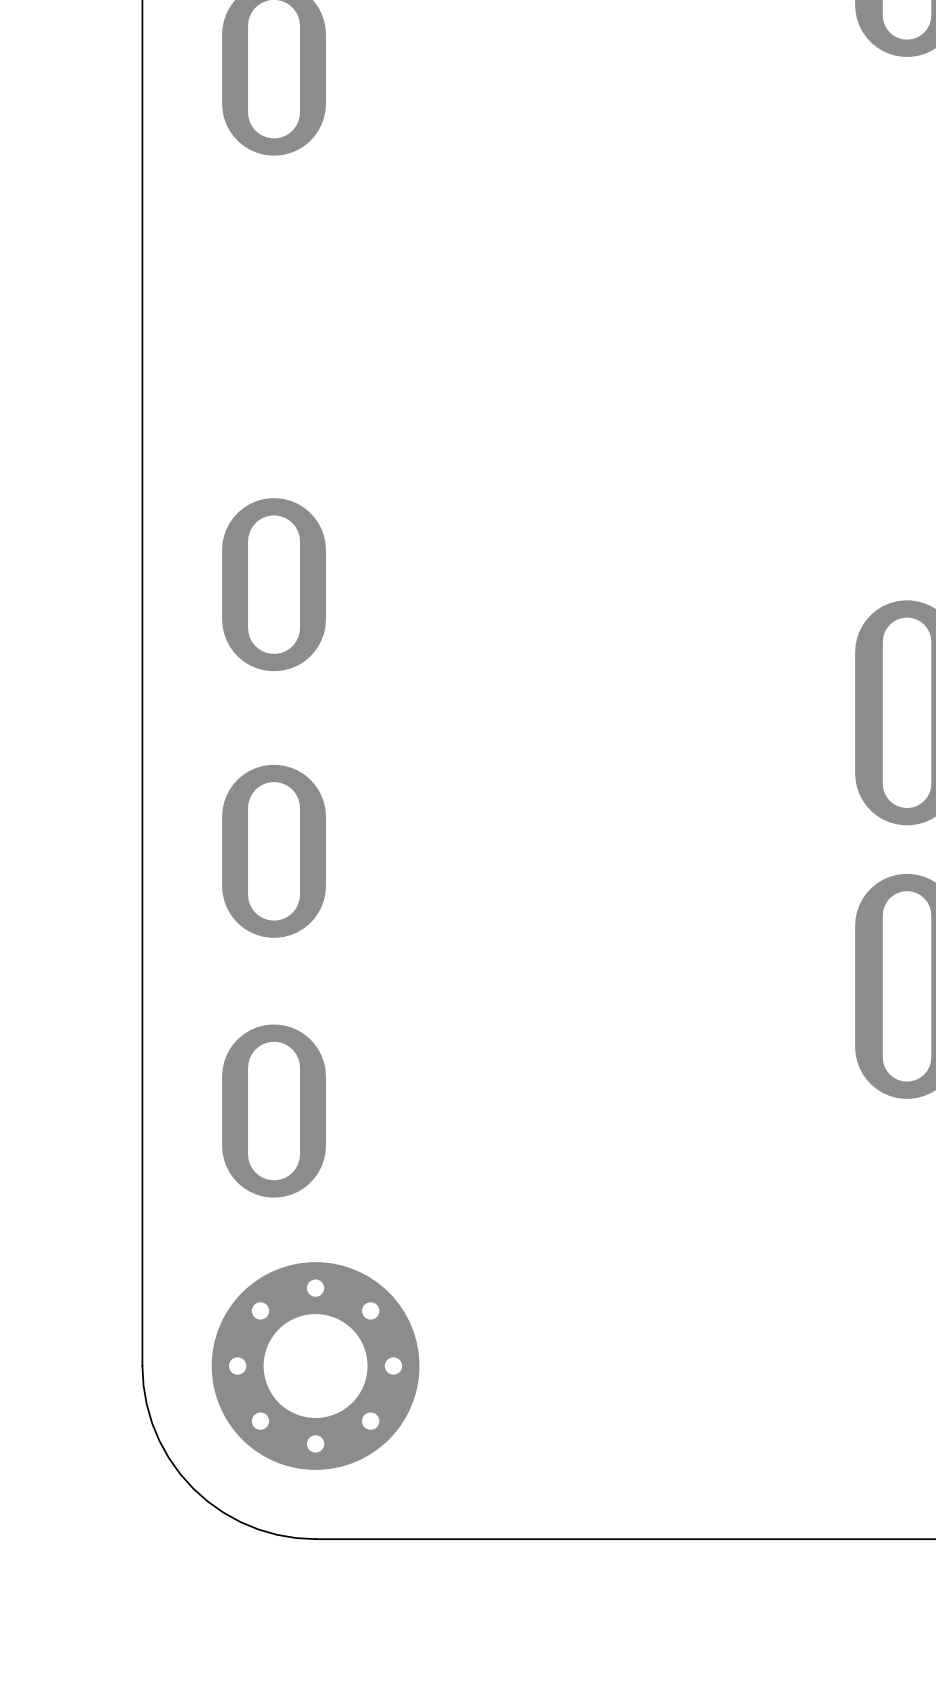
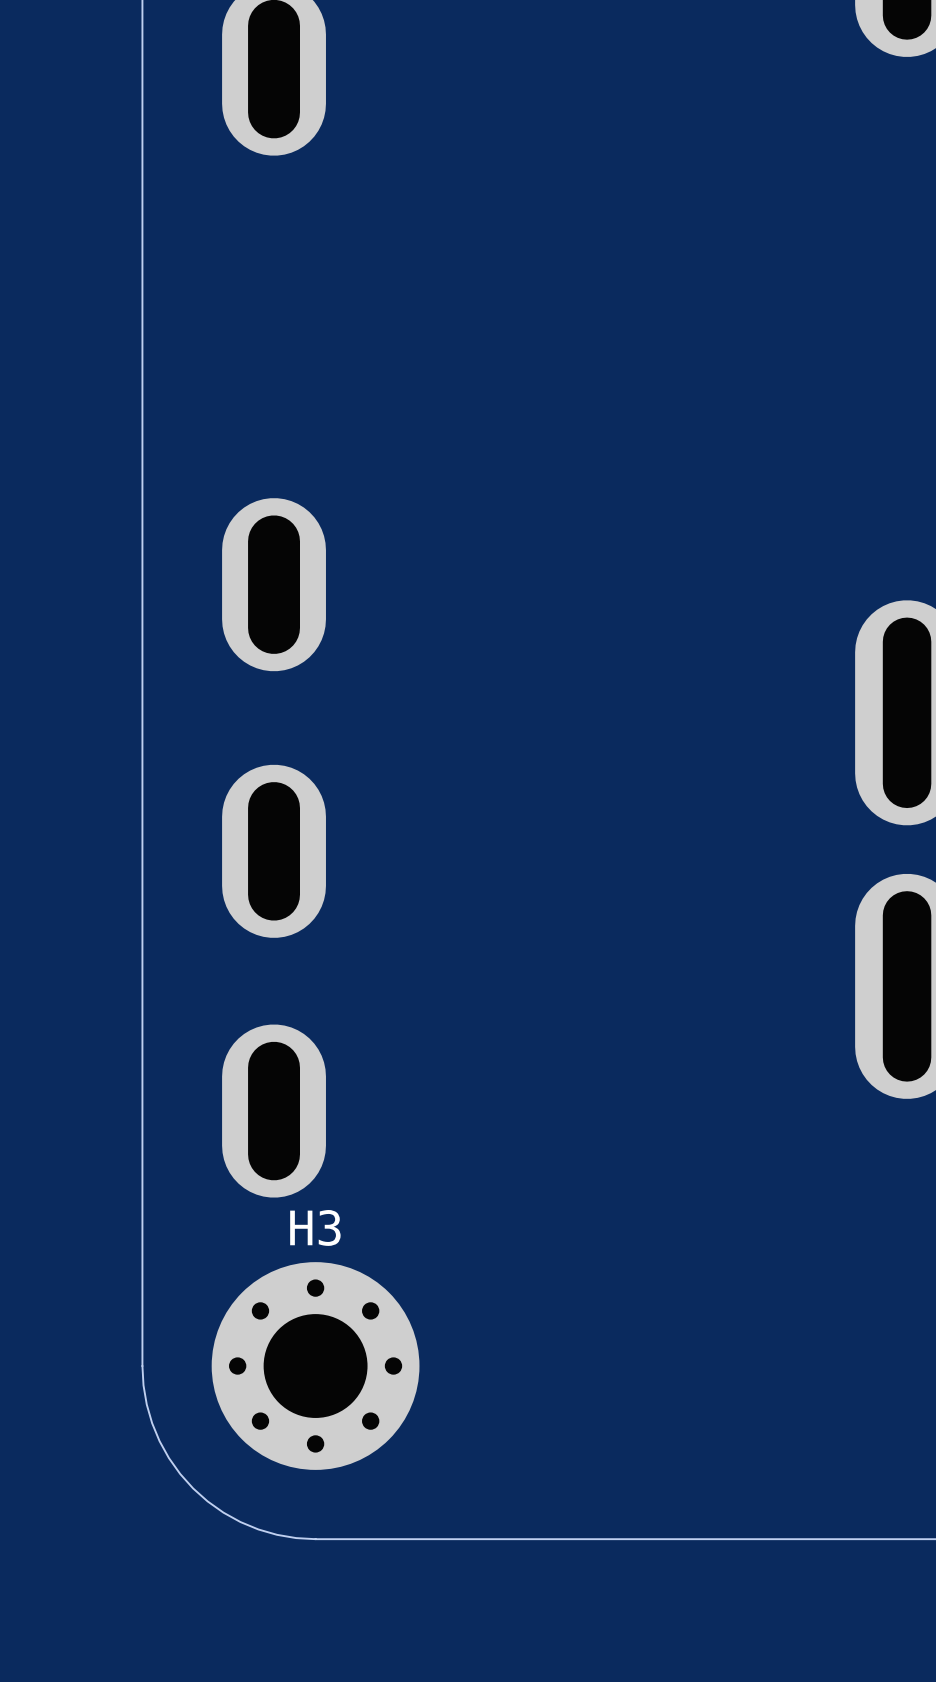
H3 name: none -> H3 (315, 1227)

